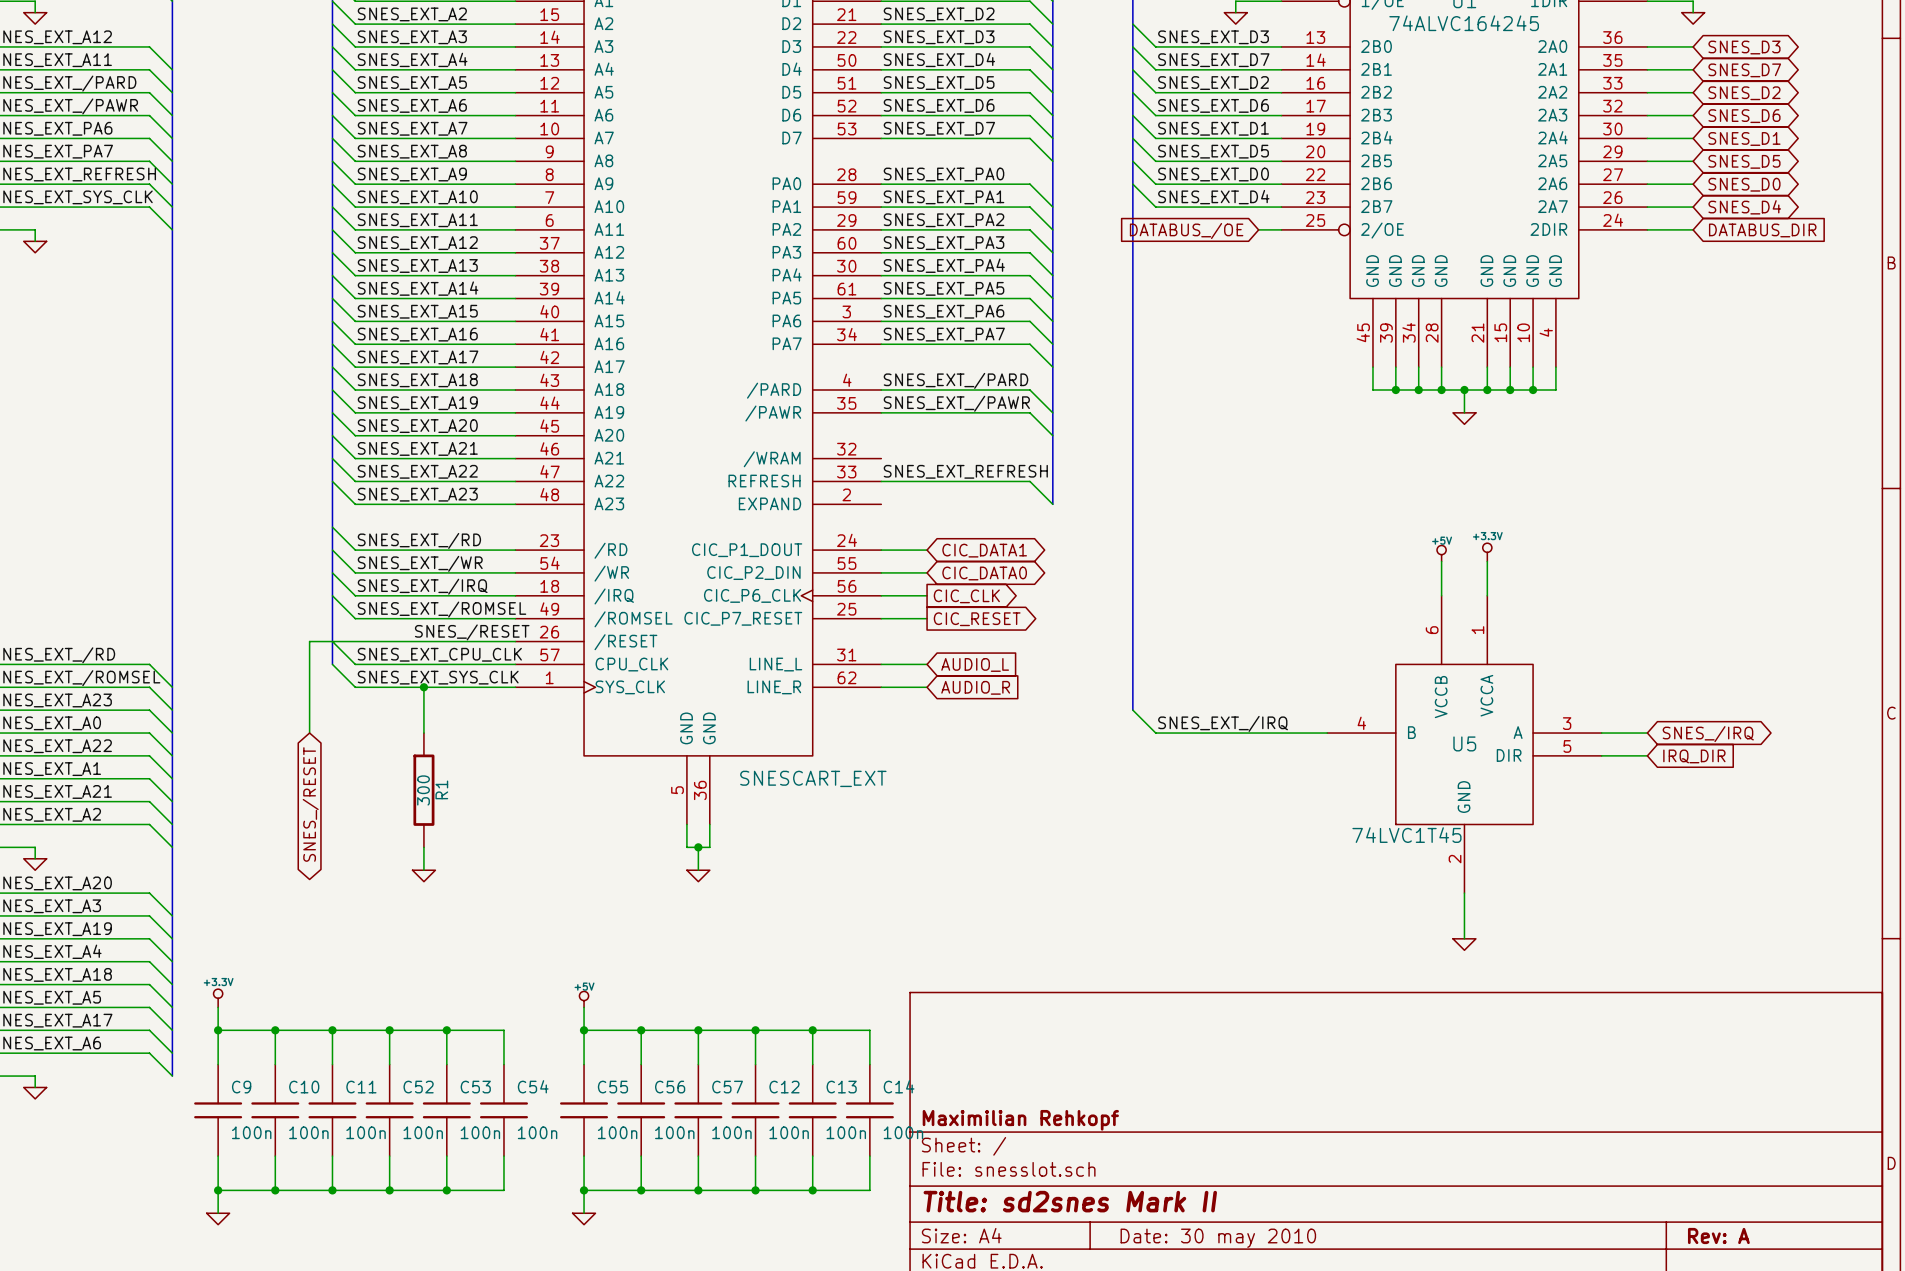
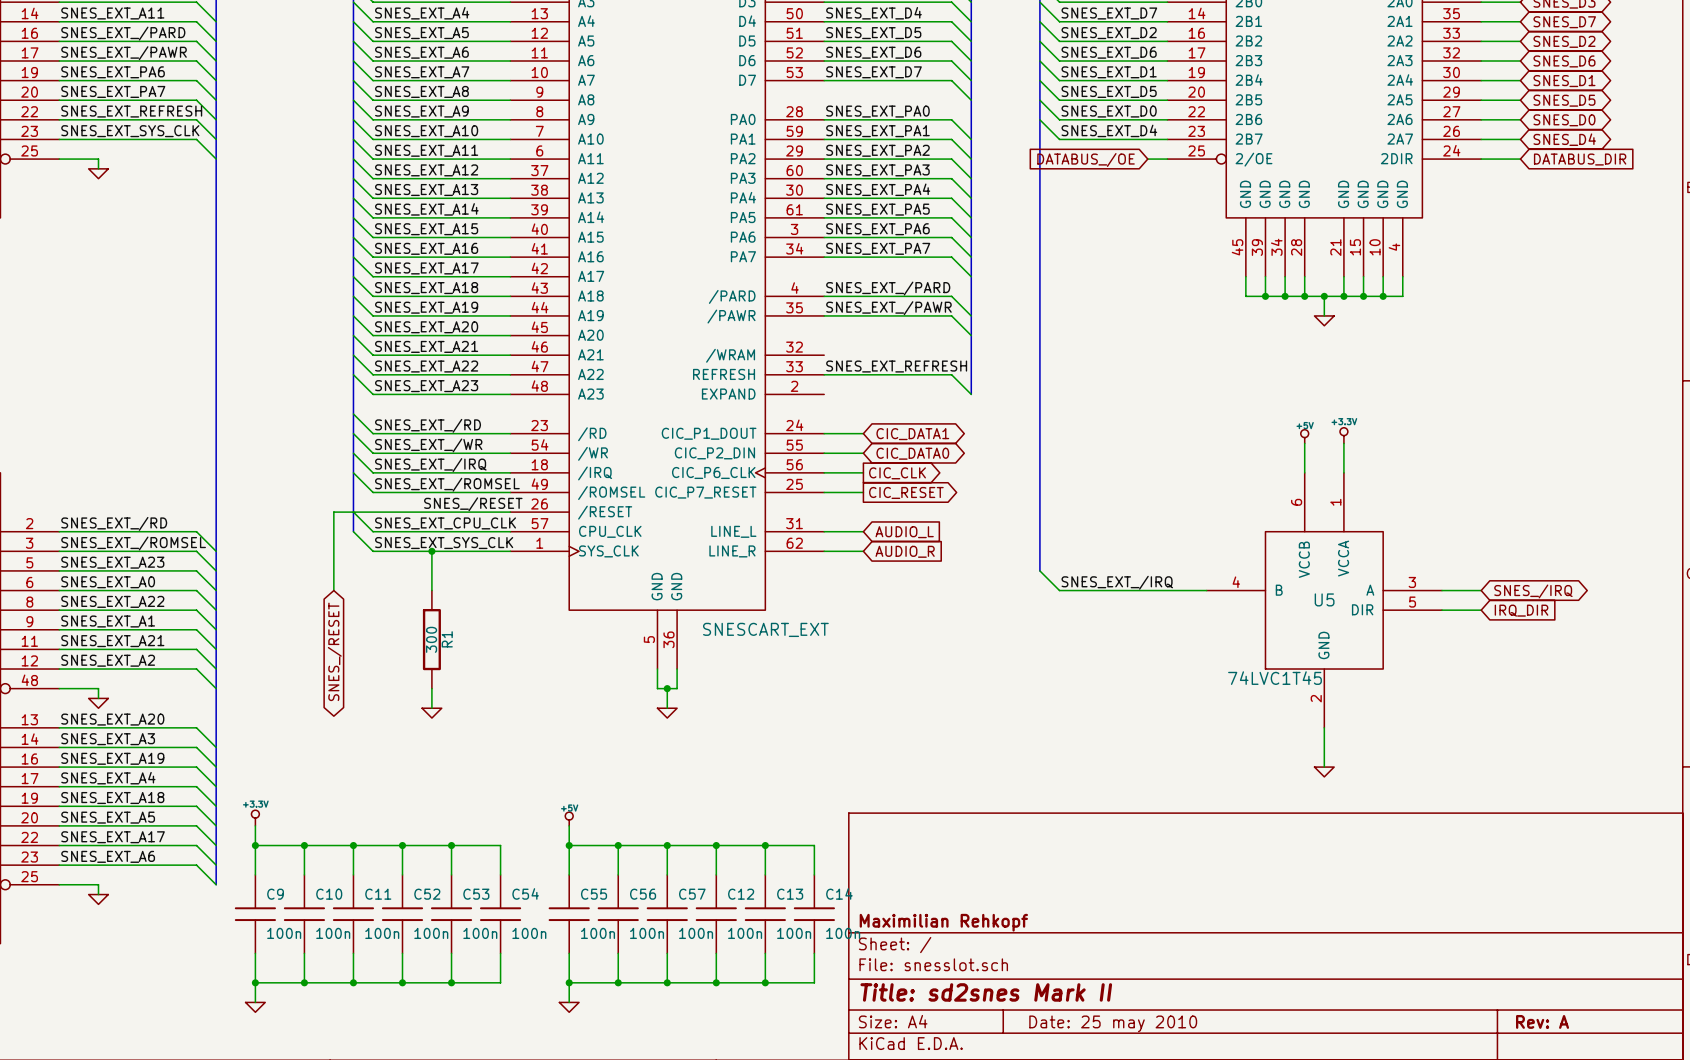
title block: Date: 30 may 2010 (1218, 1238) -> Date: 25 may 2010 (1113, 1023)

